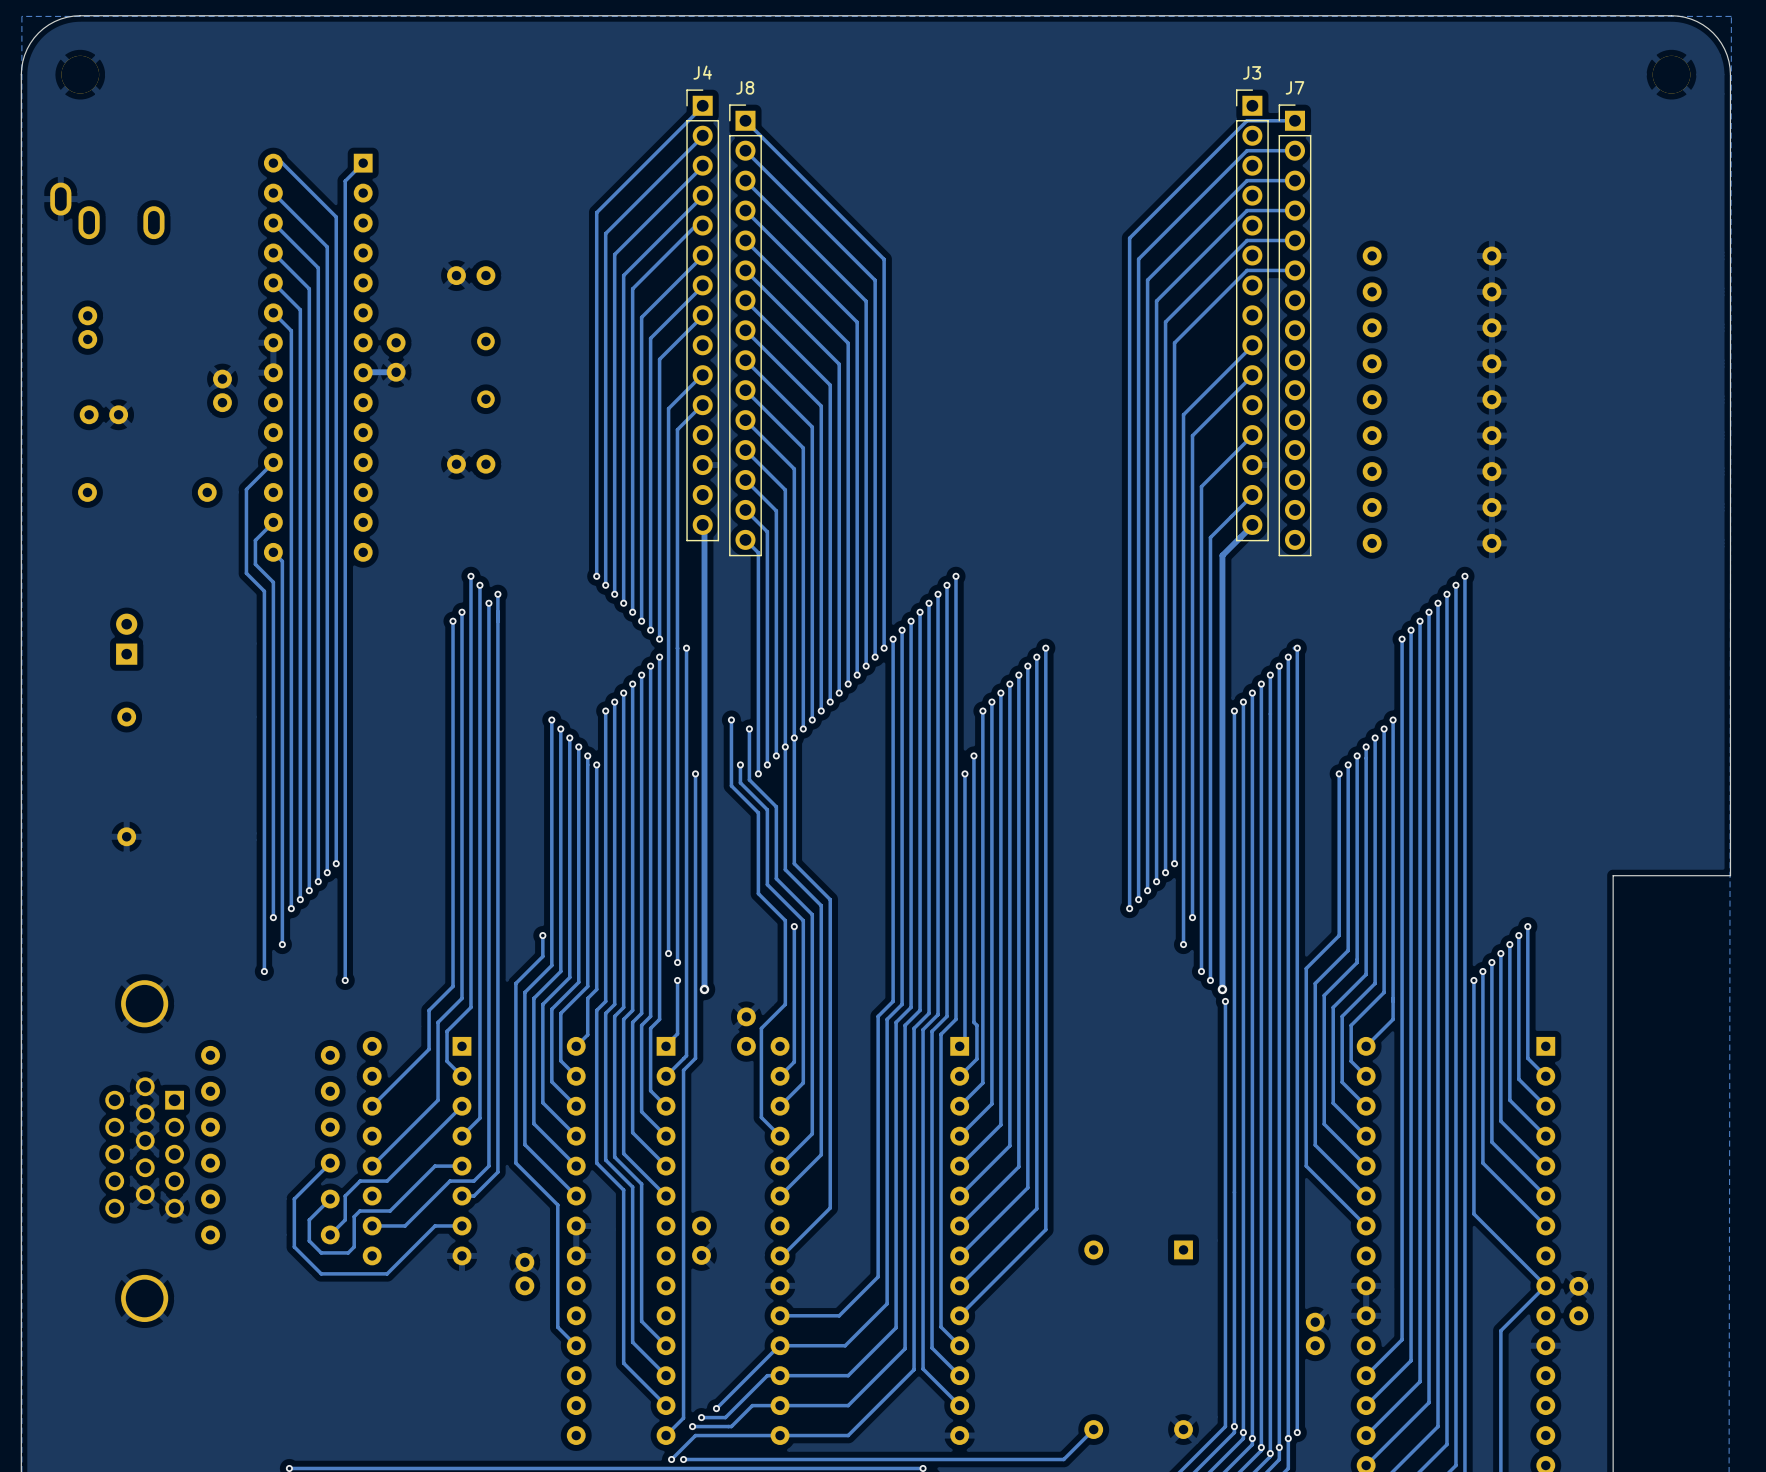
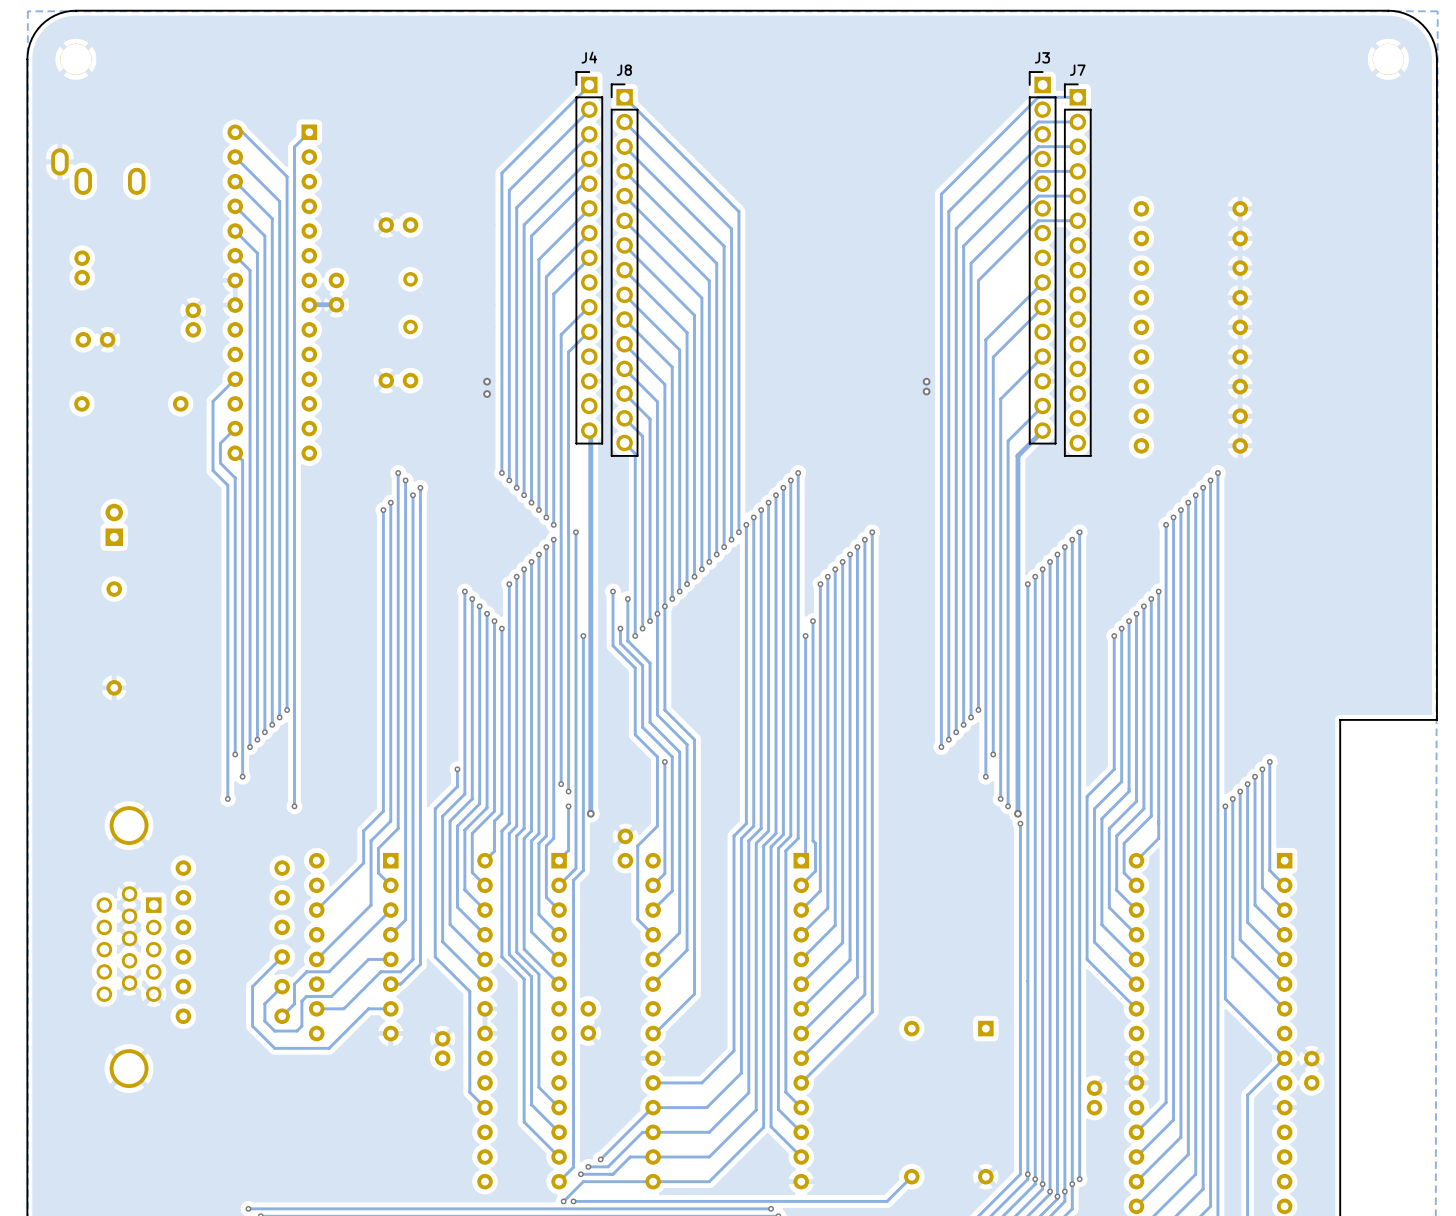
via: none -> (487, 381)
via: none -> (926, 381)
via: none -> (926, 391)
via: none -> (487, 394)

